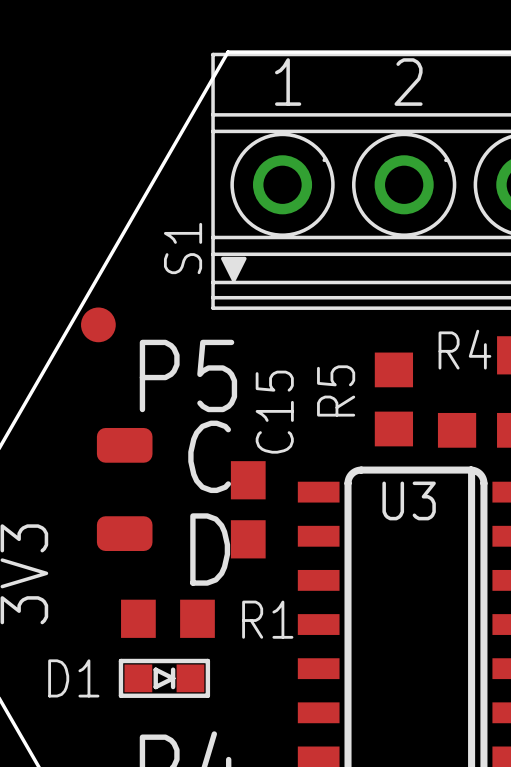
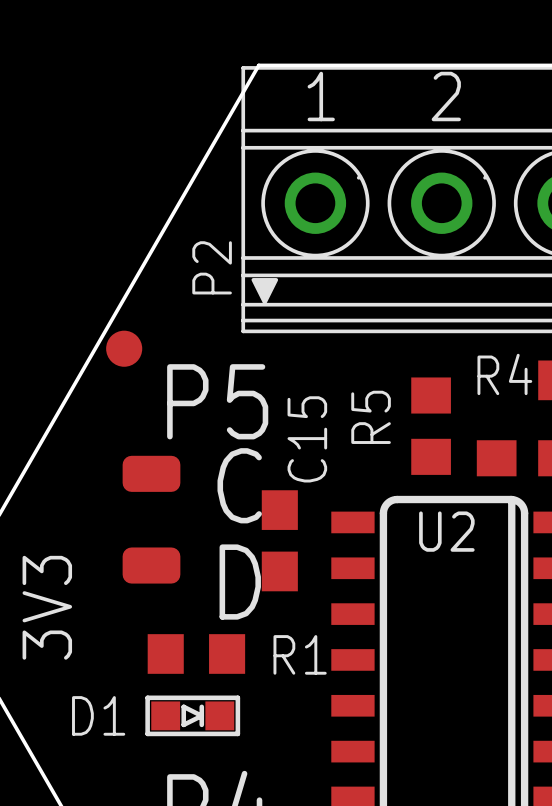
S1 name: S1 (183, 248) -> P2 (212, 267)
U3 name: U3 (409, 500) -> U2 (446, 531)

